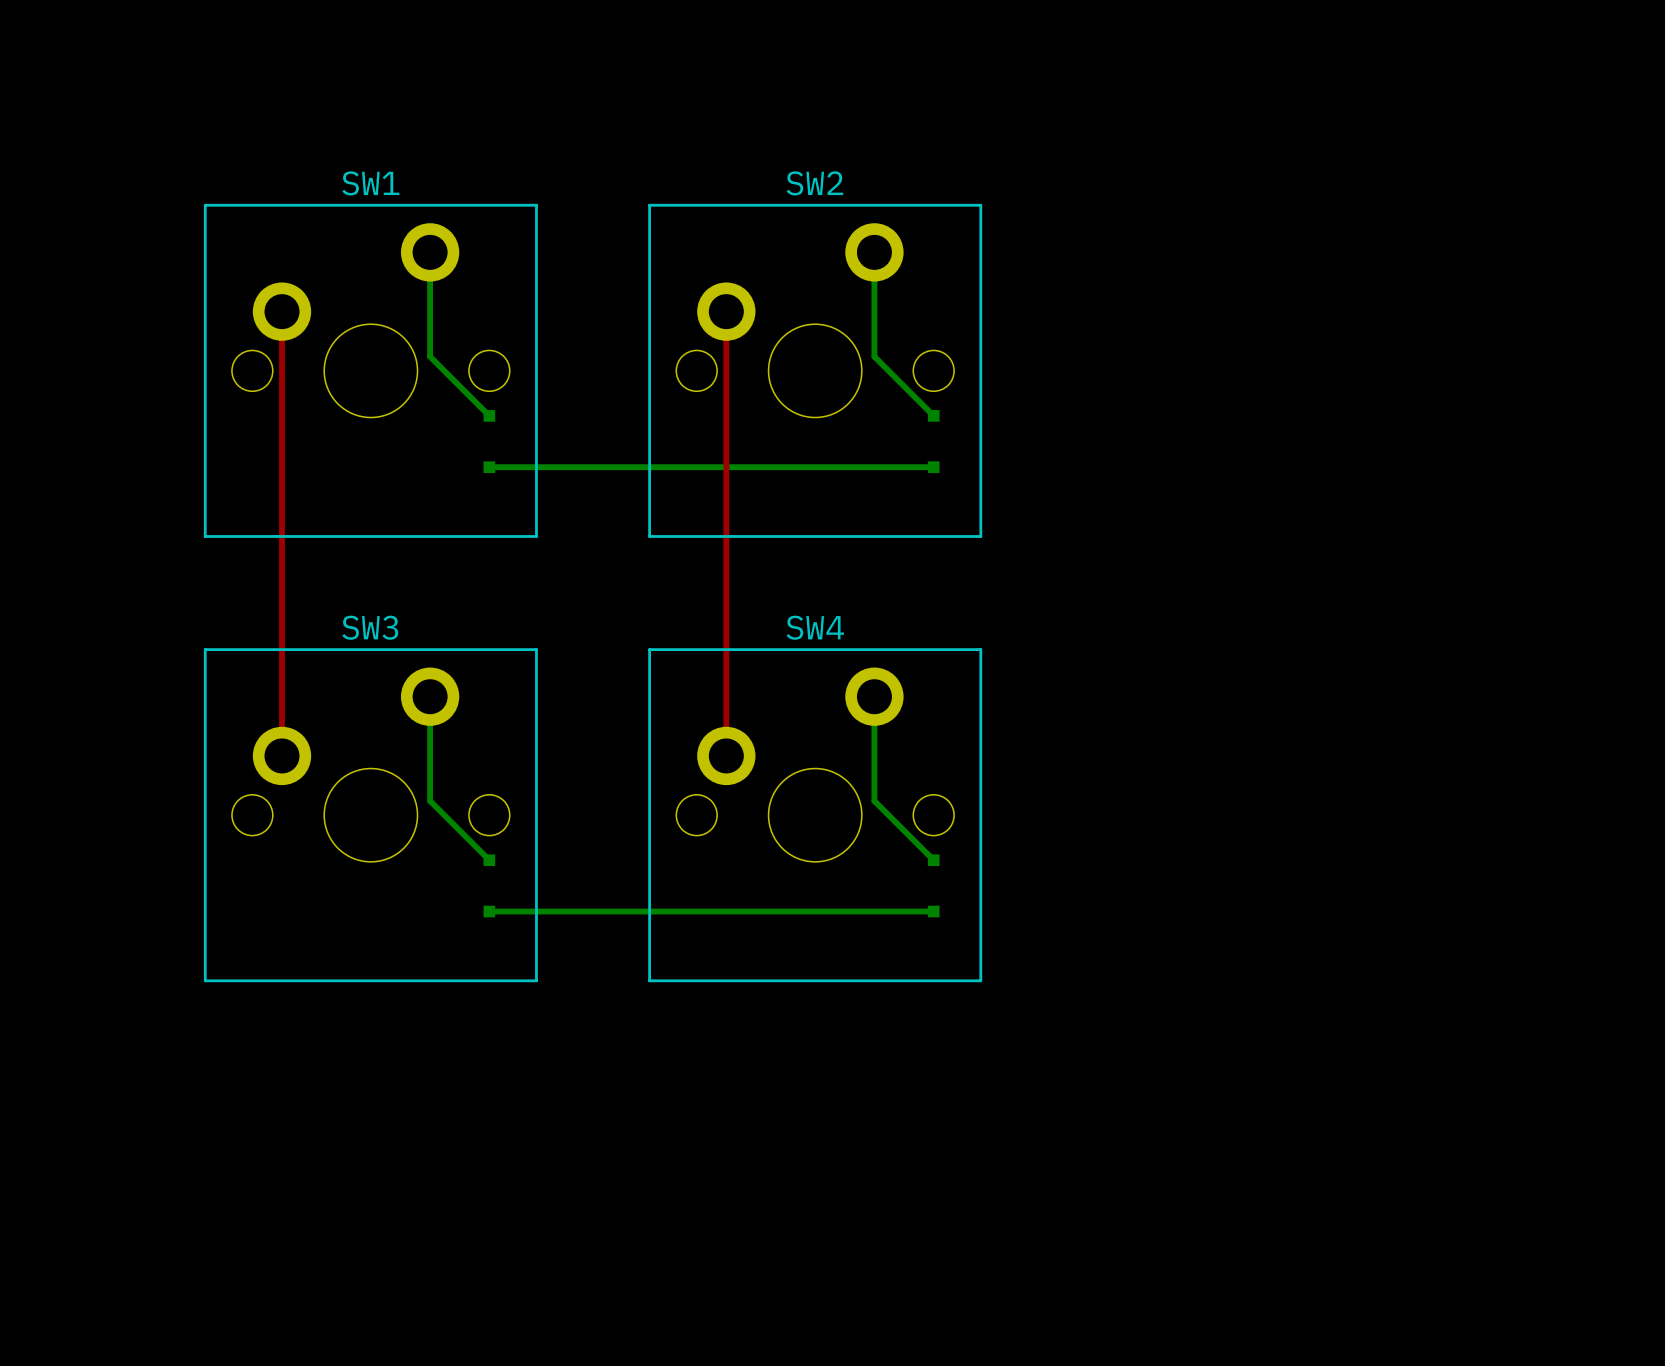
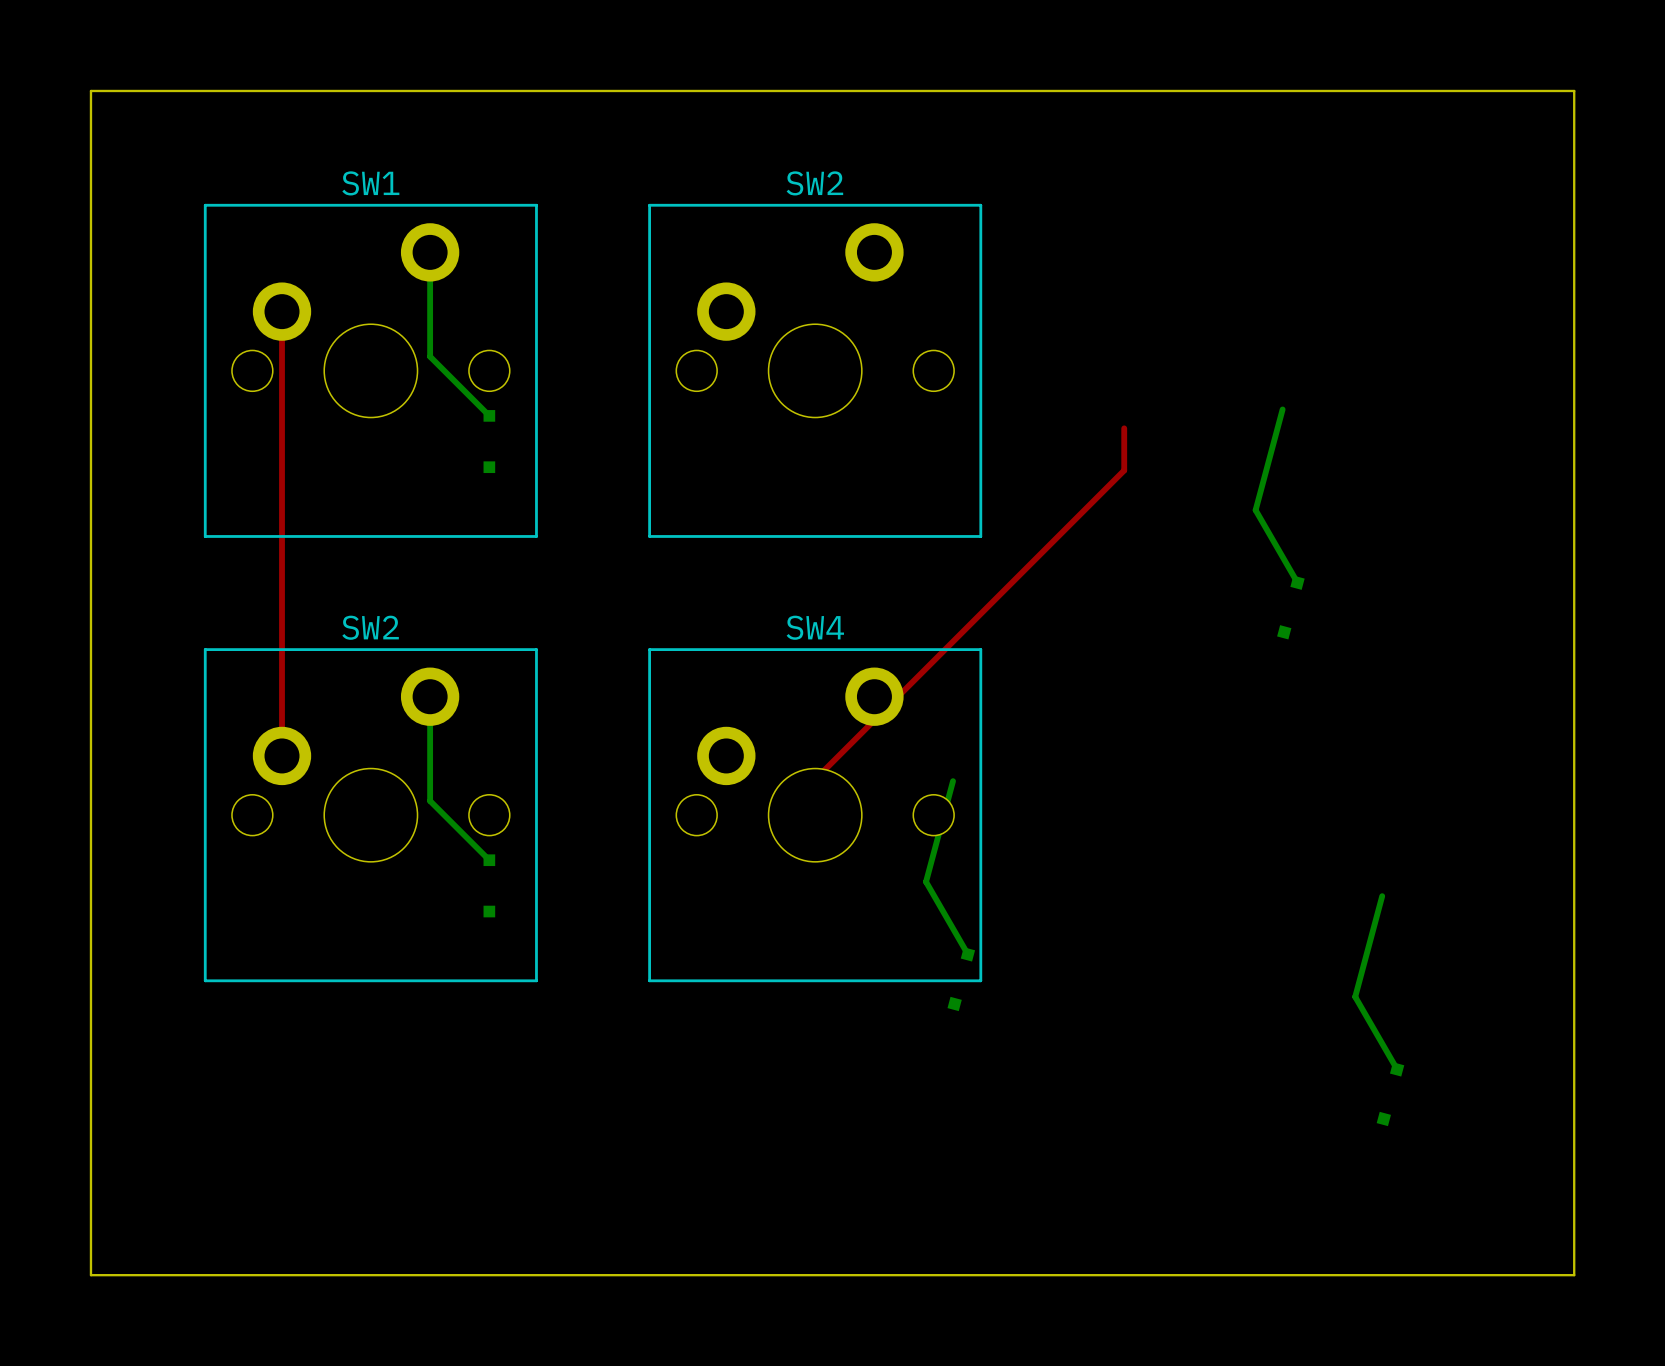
board edge: none -> (90, 90) (90, 1275) (1574, 1275) (1574, 90) (90, 90)
bottom track: (874, 252) (874, 356) (933, 415) -> none
top track: (726, 311) (726, 755) -> none
bottom track: none -> (1282, 409) (1255, 510) (1297, 582)
top track: none -> (1124, 428) (1124, 470) (794, 800)
part: (933, 441) -> none
bottom track: (489, 467) (933, 467) -> none
part: none -> (1290, 607)
SW3 name: SW3 (370, 627) -> SW2 (370, 627)
bottom track: (874, 696) (874, 800) (933, 860) -> none
bottom track: none -> (953, 781) (926, 881) (967, 954)
part: (933, 885) -> none
bottom track: none -> (1382, 896) (1355, 996) (1397, 1069)
bottom track: (489, 911) (933, 911) -> none
part: none -> (961, 979)
part: none -> (1390, 1094)

